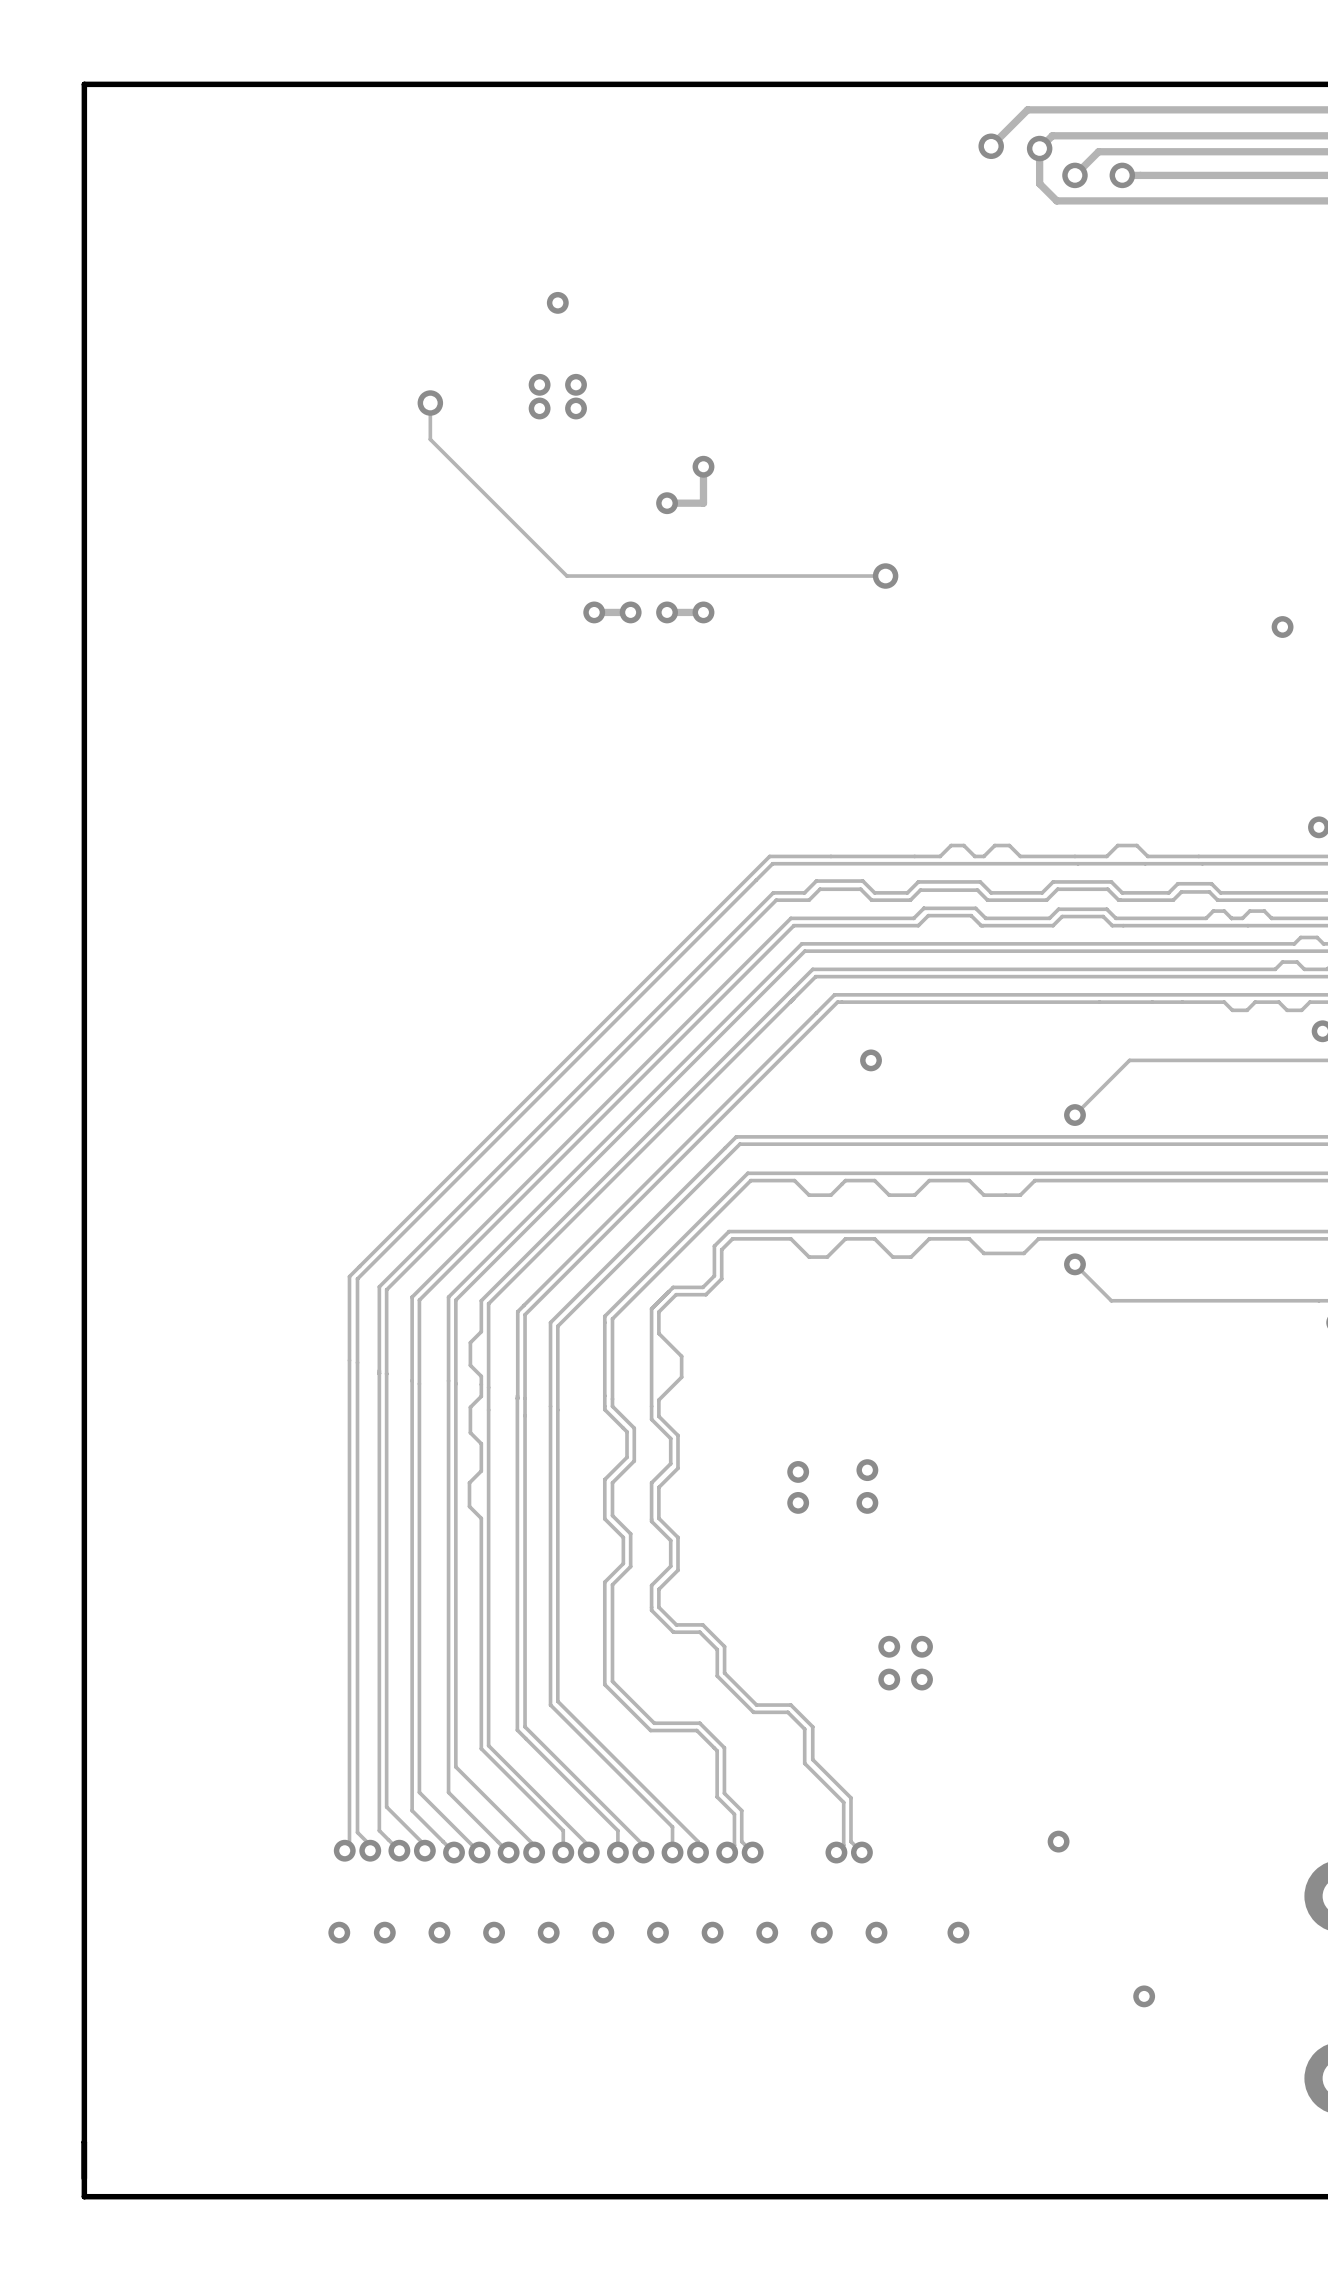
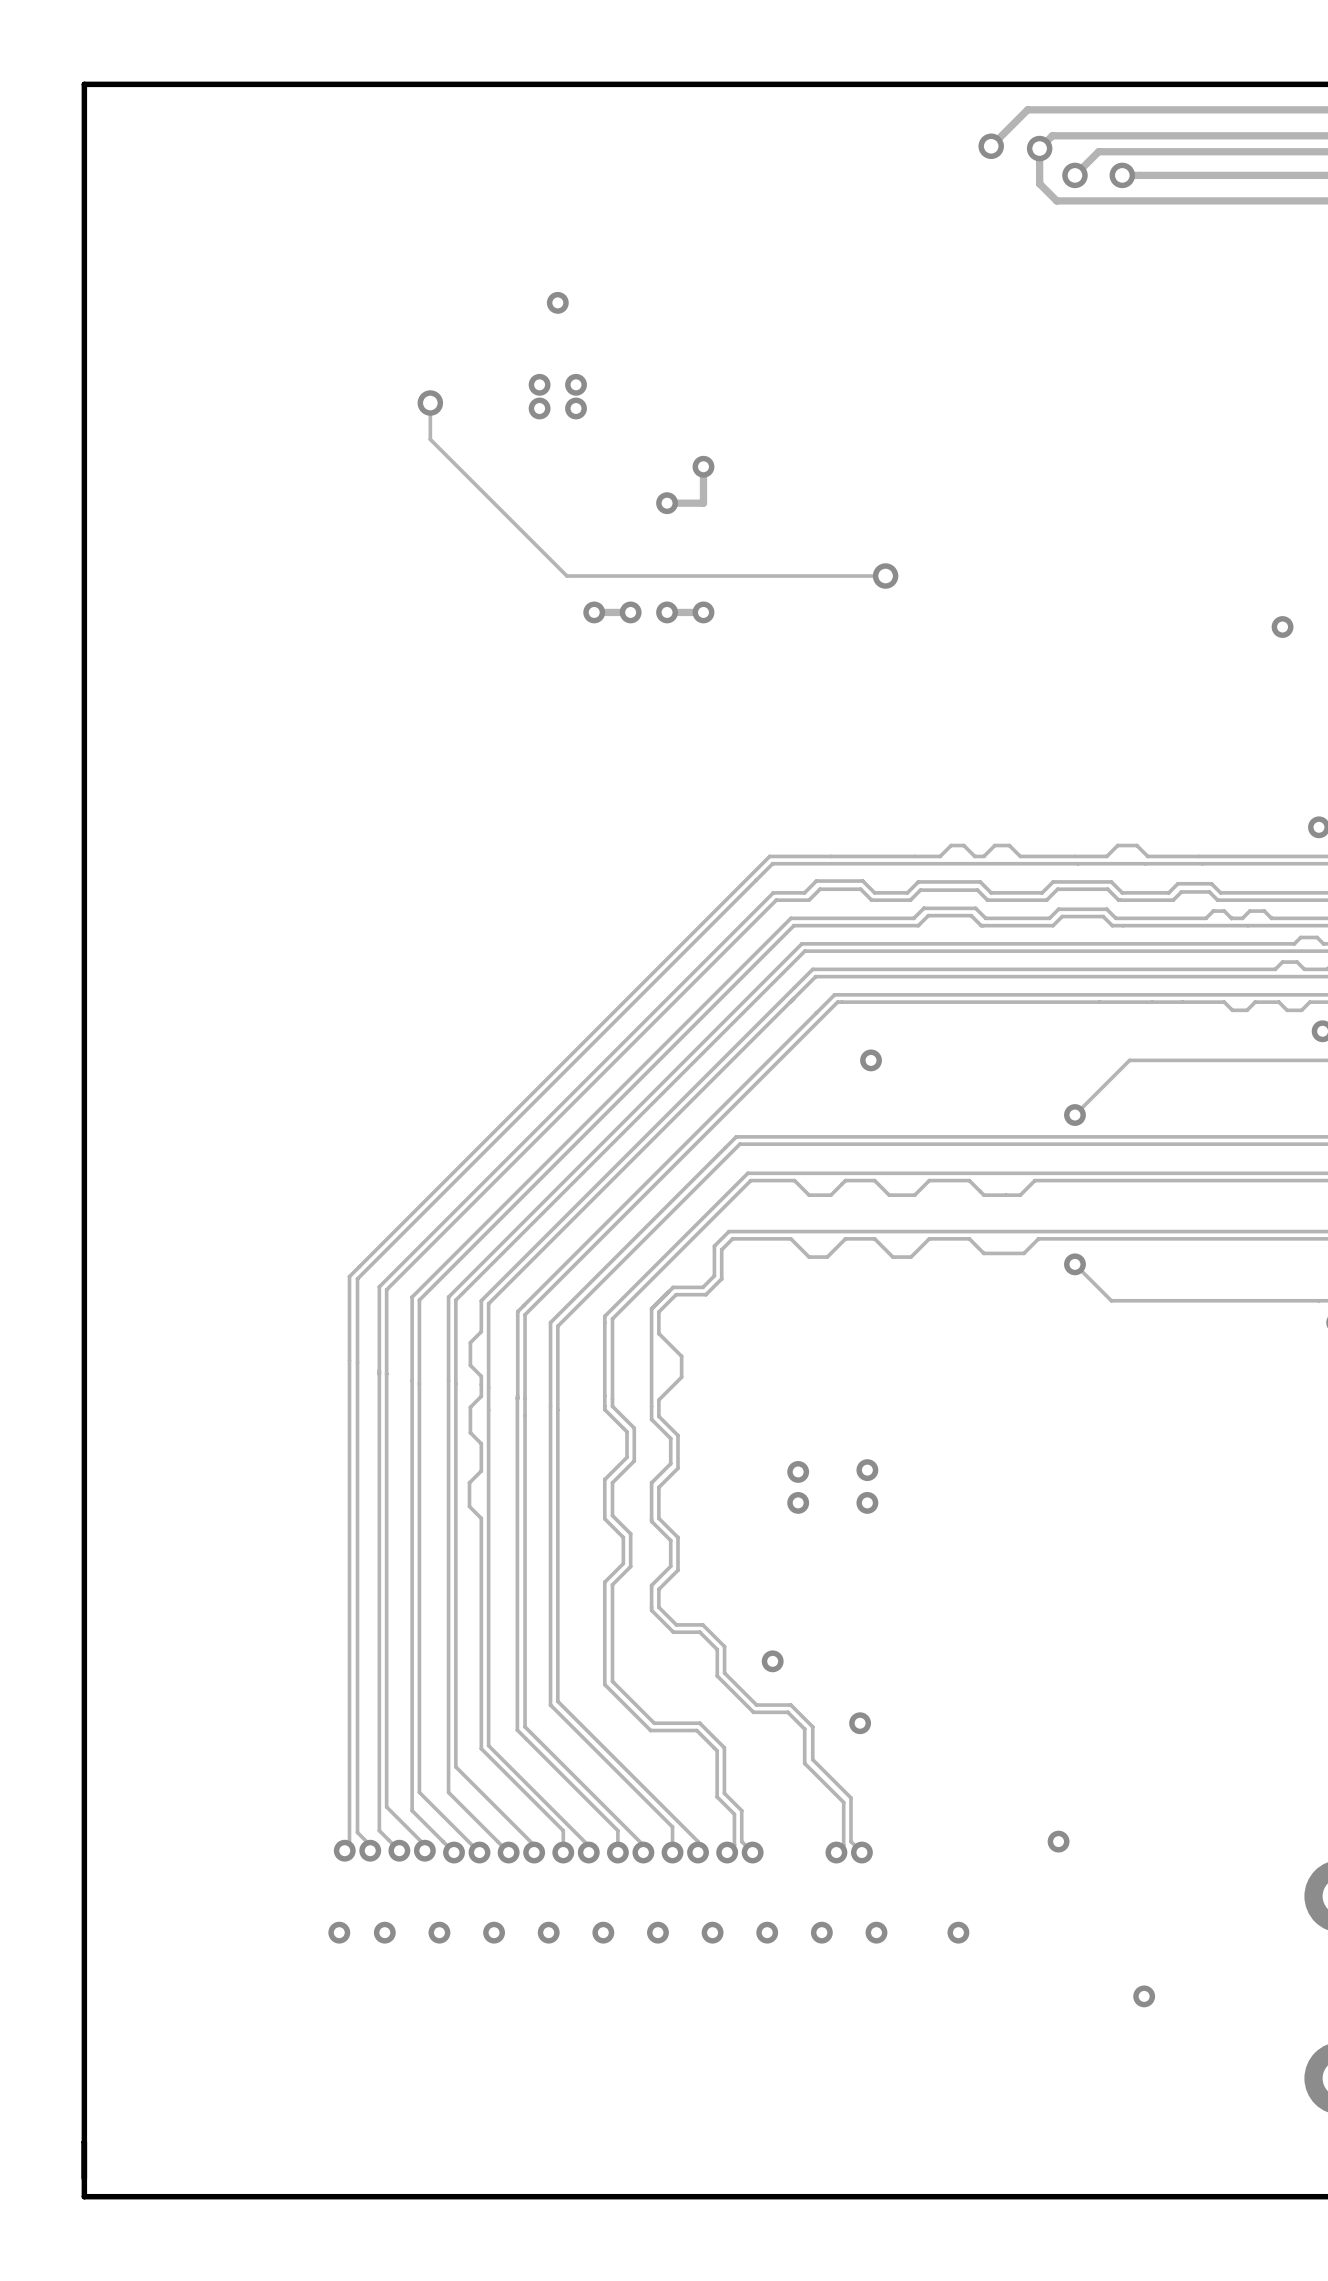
via: (889, 1646) -> none
via: (922, 1646) -> none
via: none -> (772, 1661)
via: (889, 1679) -> none
via: (922, 1679) -> none
via: none -> (860, 1723)

